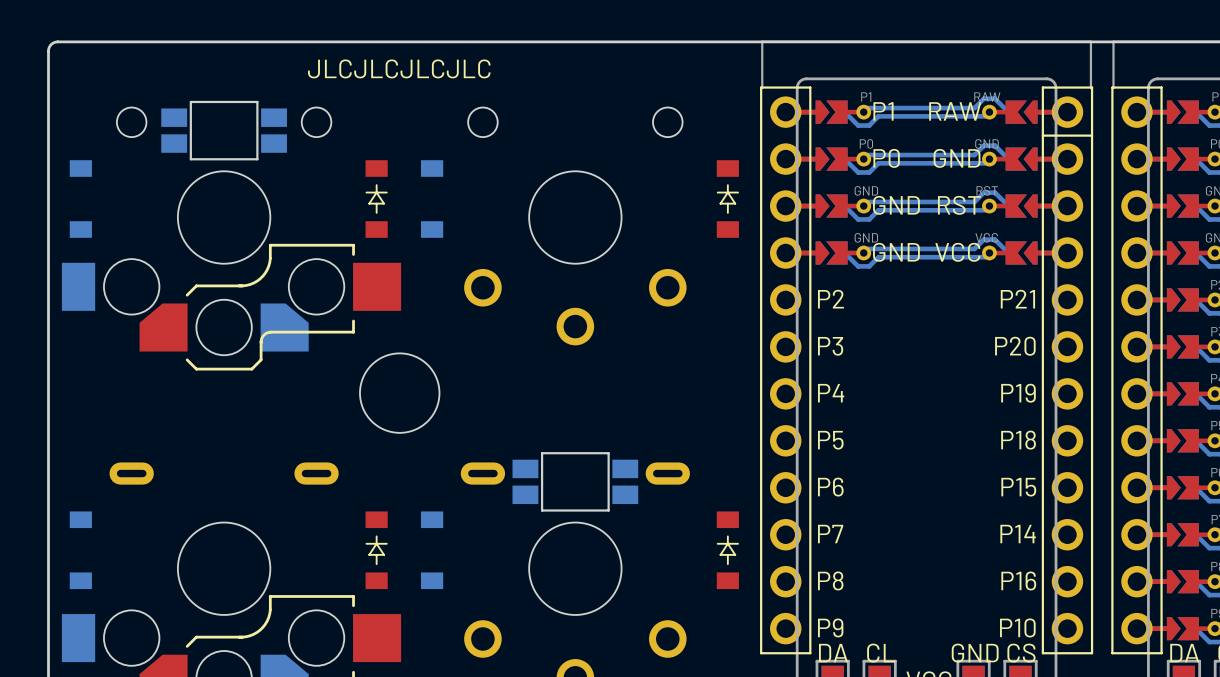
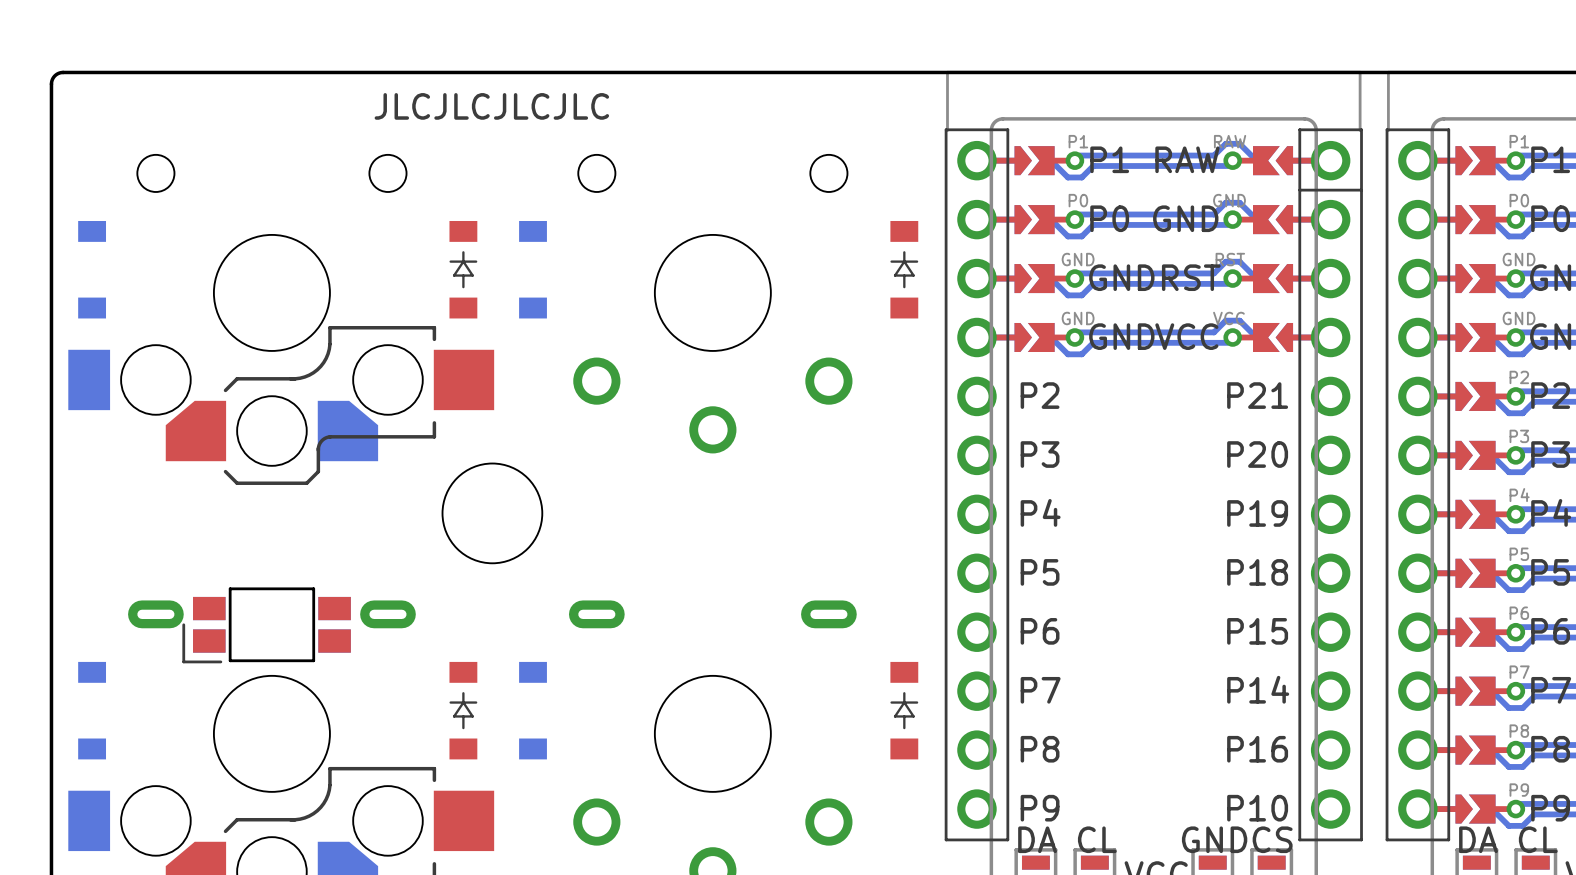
part: (224, 130) -> none
part: (575, 481) -> none
part: none -> (266, 625)

